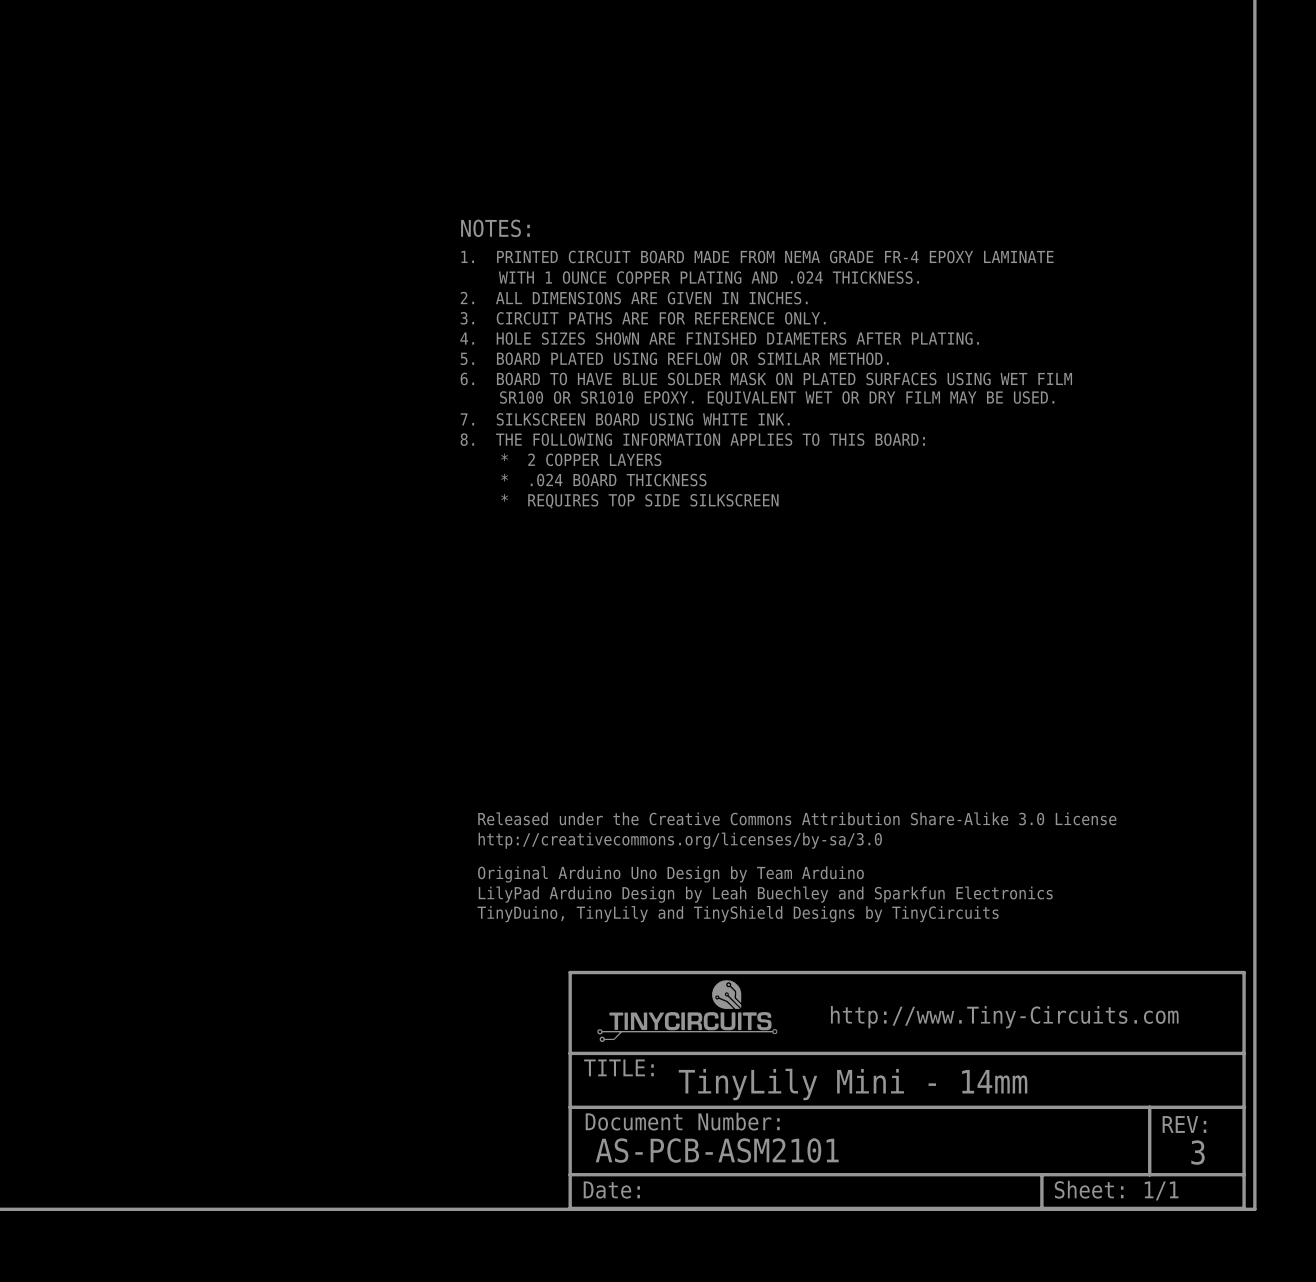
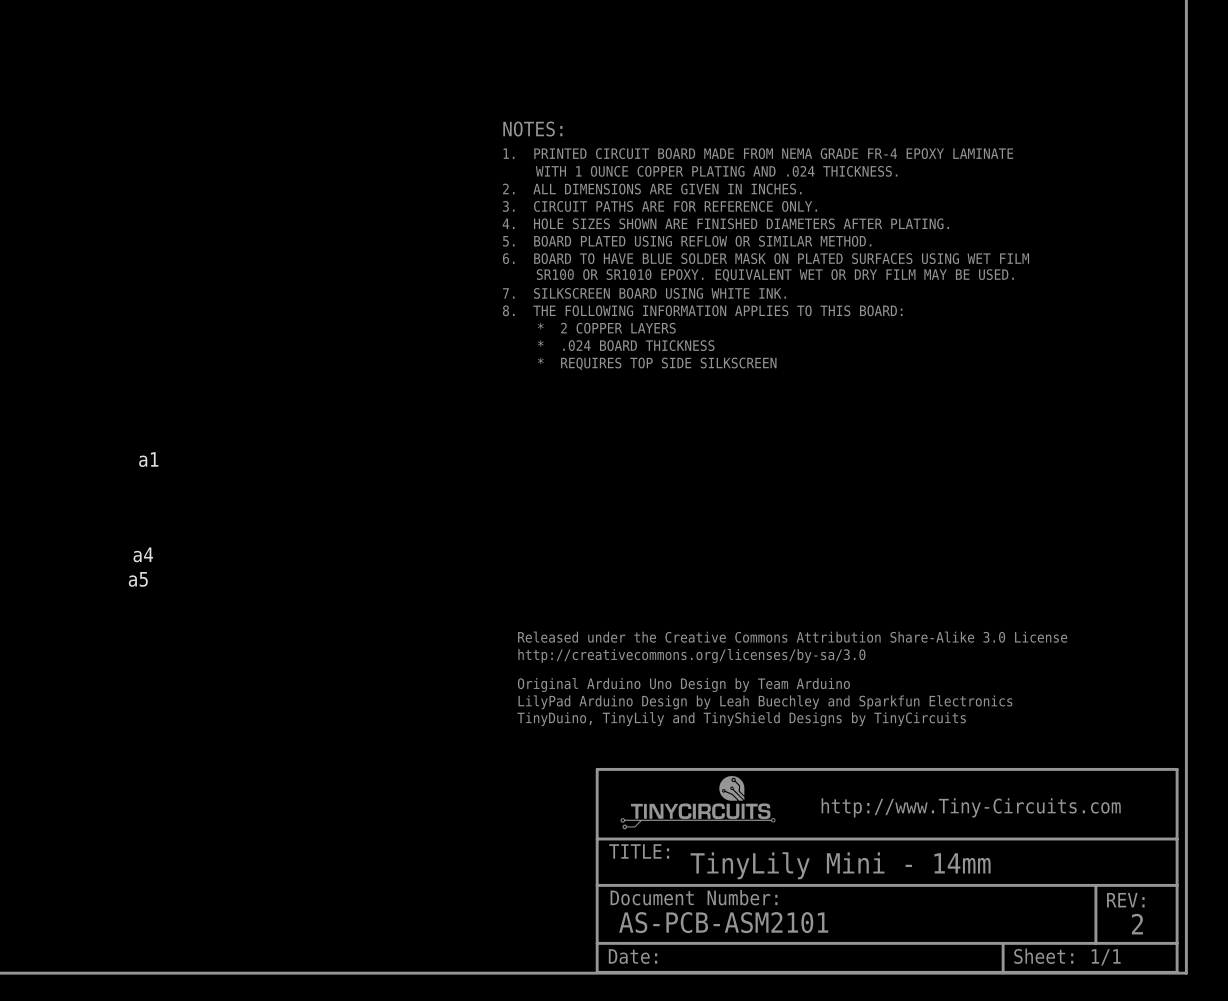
text: none -> a1 (148, 459)
text: none -> a4 (143, 554)
text: none -> a5 (138, 579)
text: 3 (1198, 1152) -> 2 (1137, 924)

